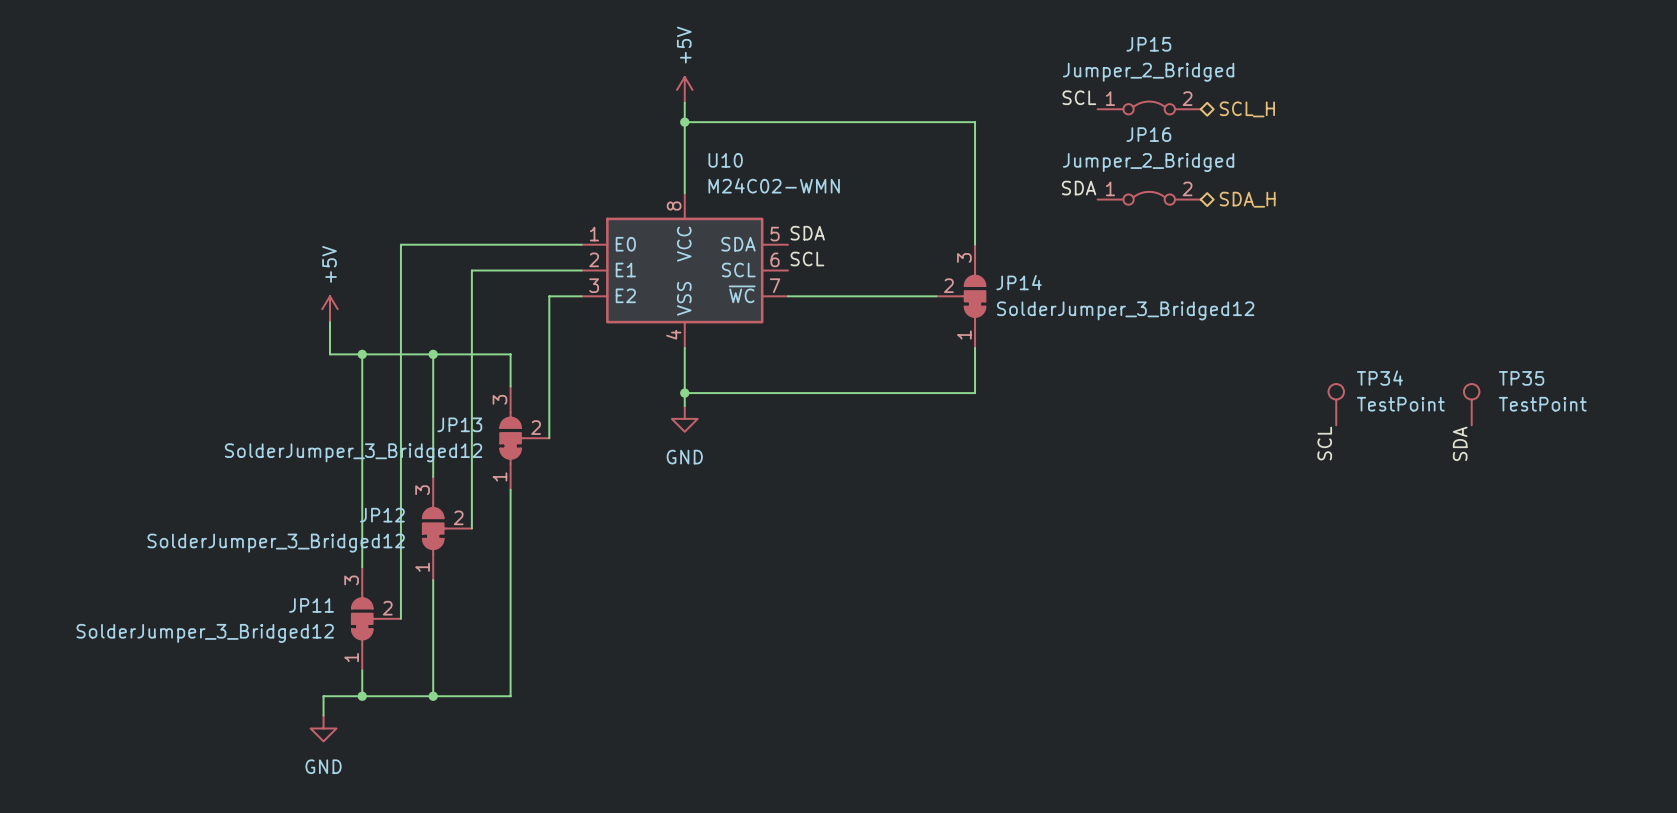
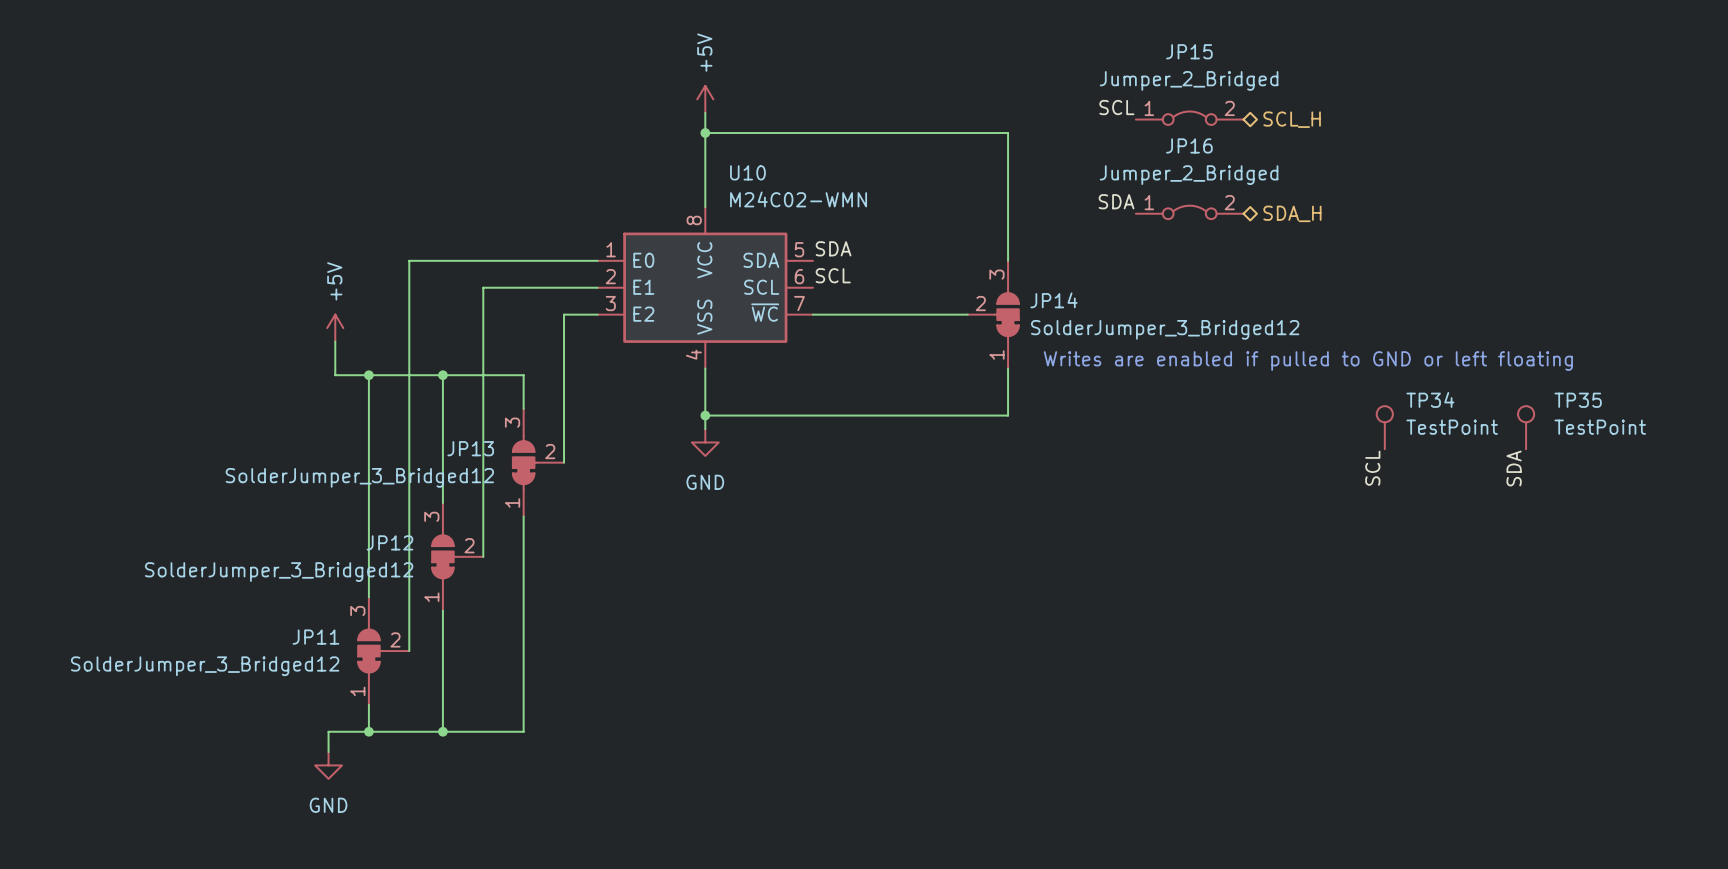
text: none -> Writes are enabled if pulled to GND or left floating (1308, 361)

